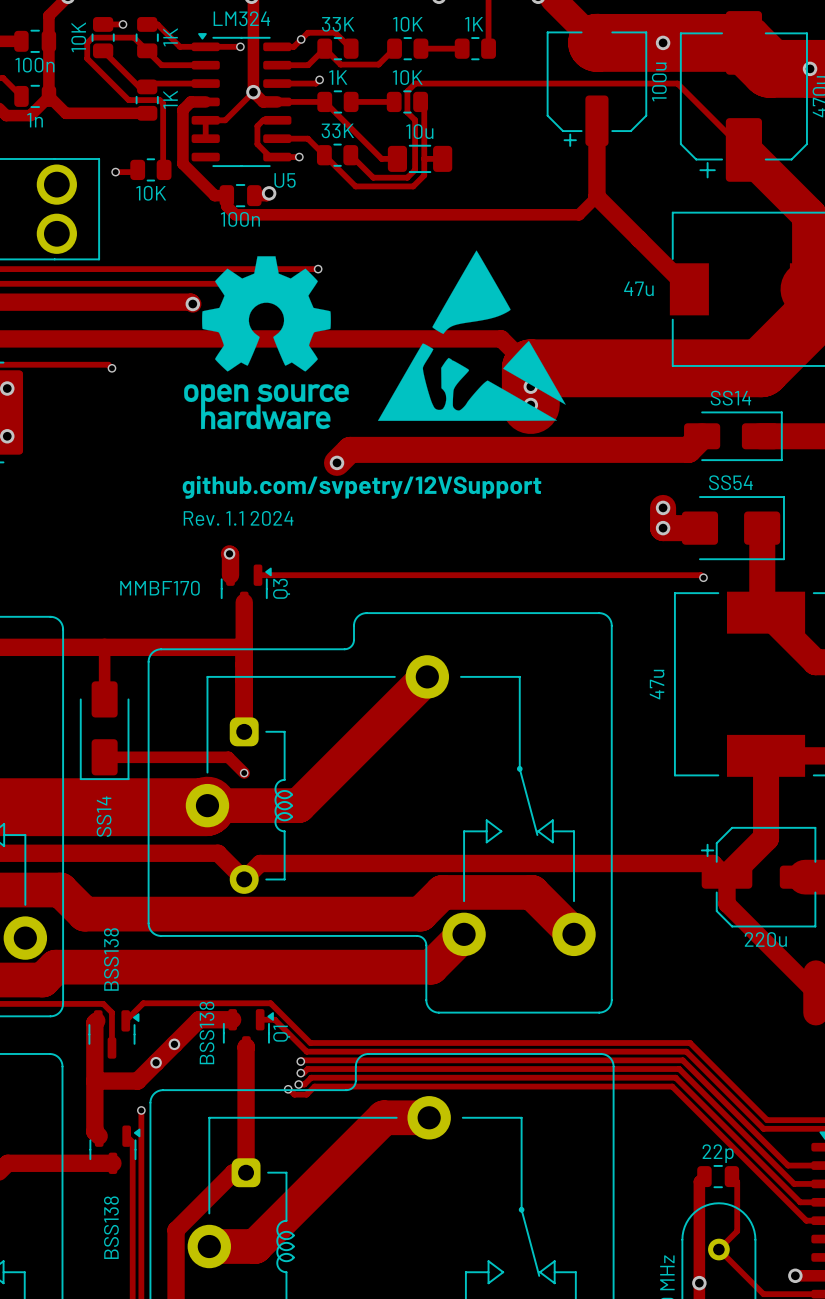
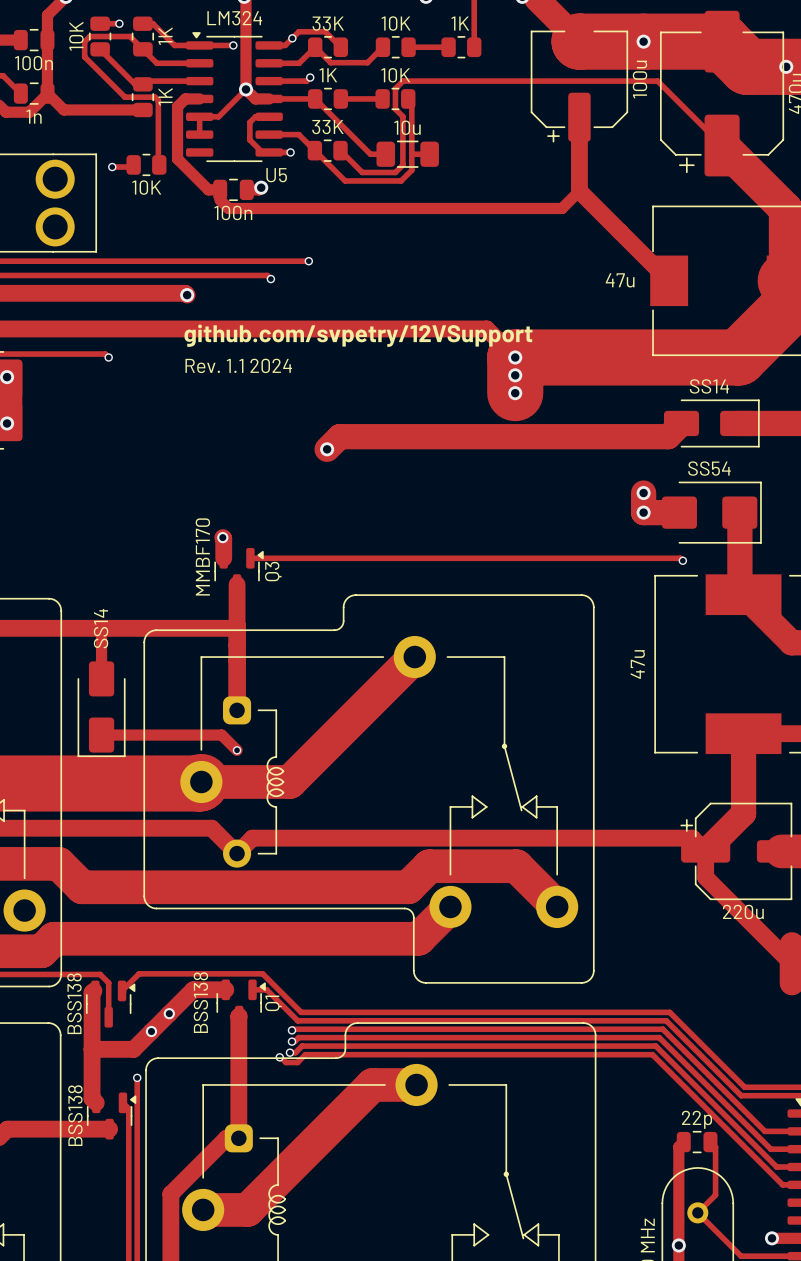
drawing: [377, 250, 566, 421] -> none
drawing: [184, 256, 349, 430] -> none
text position: github.com/svpetry/12VSupport (361, 487) -> github.com/svpetry/12VSupport (358, 335)
text position: Rev. 1.1 2024 (238, 518) -> Rev. 1.1 2024 (238, 365)
Q3 value rotation: 0° (159, 588) -> 90° counterclockwise (202, 556)
part value position: SS14 (104, 816) -> SS14 (101, 628)
part value position: BSS138 (111, 959) -> BSS138 (74, 1003)
part value position: BSS138 (111, 1227) -> BSS138 (75, 1115)

